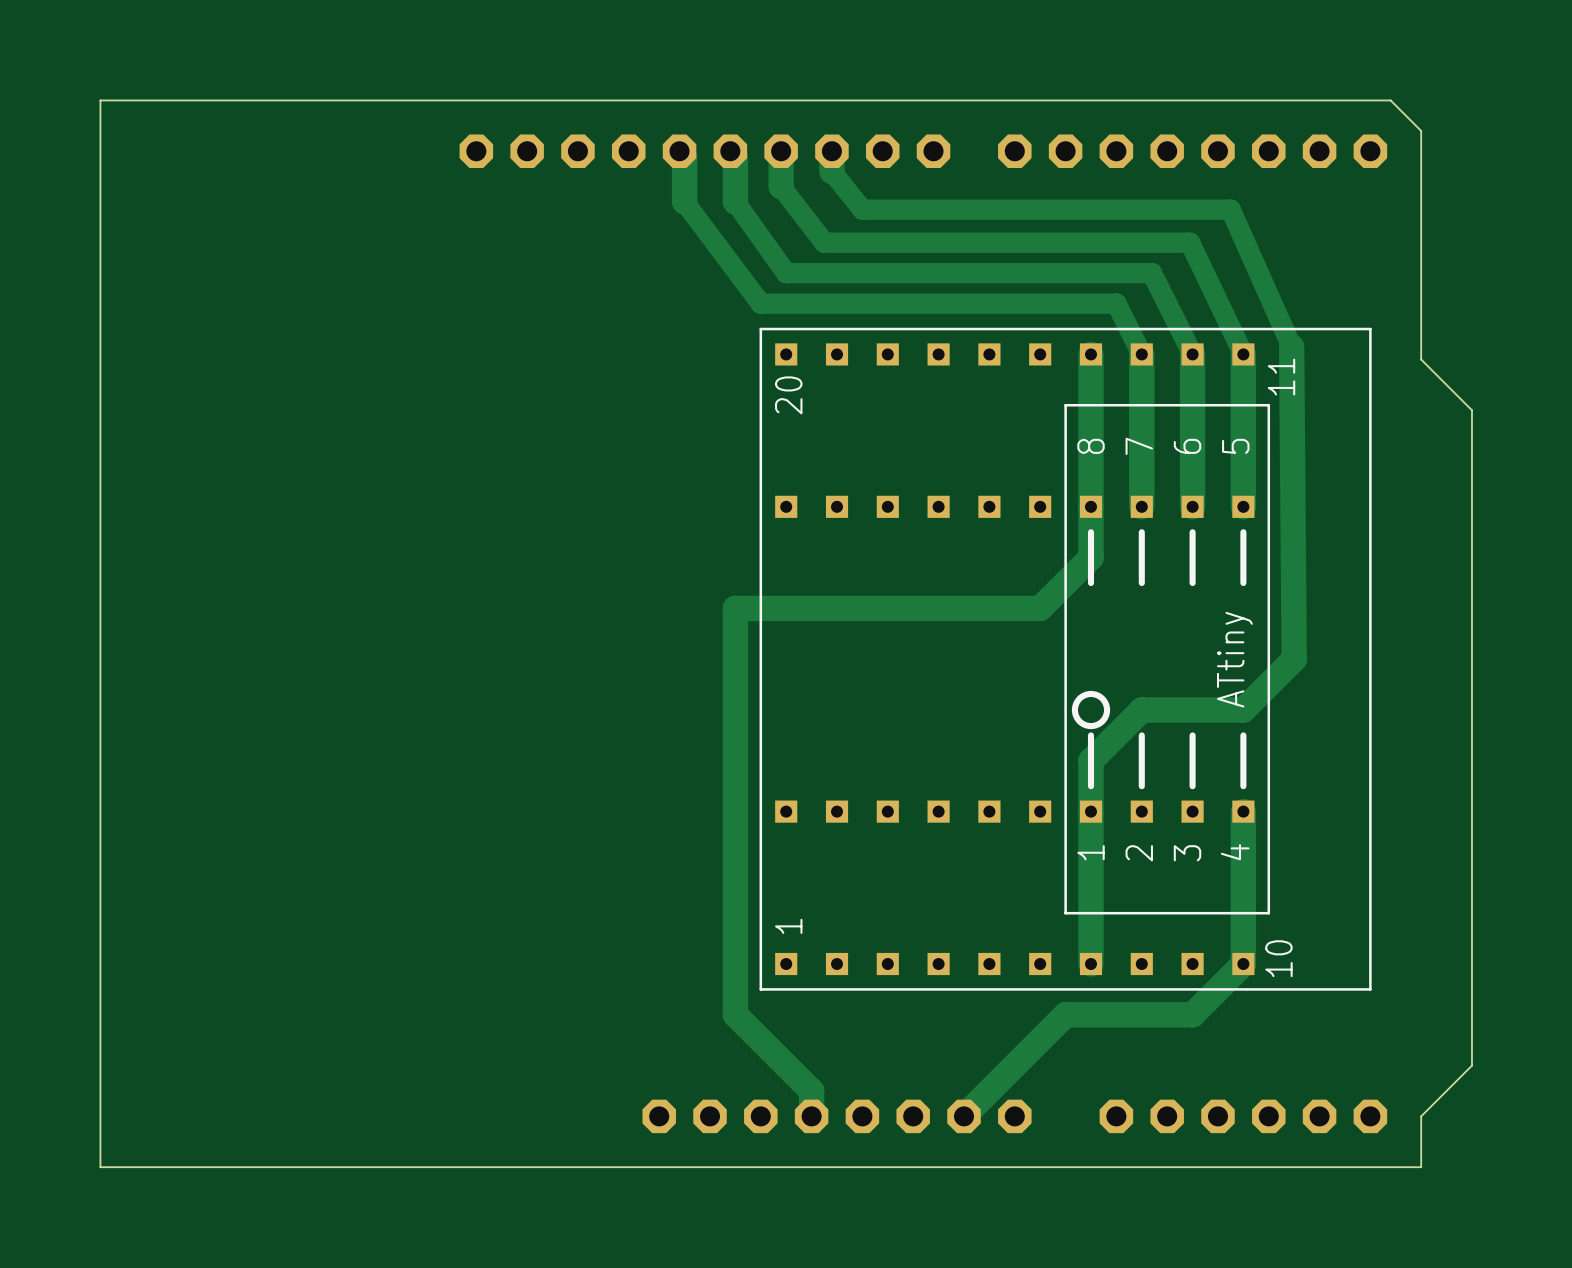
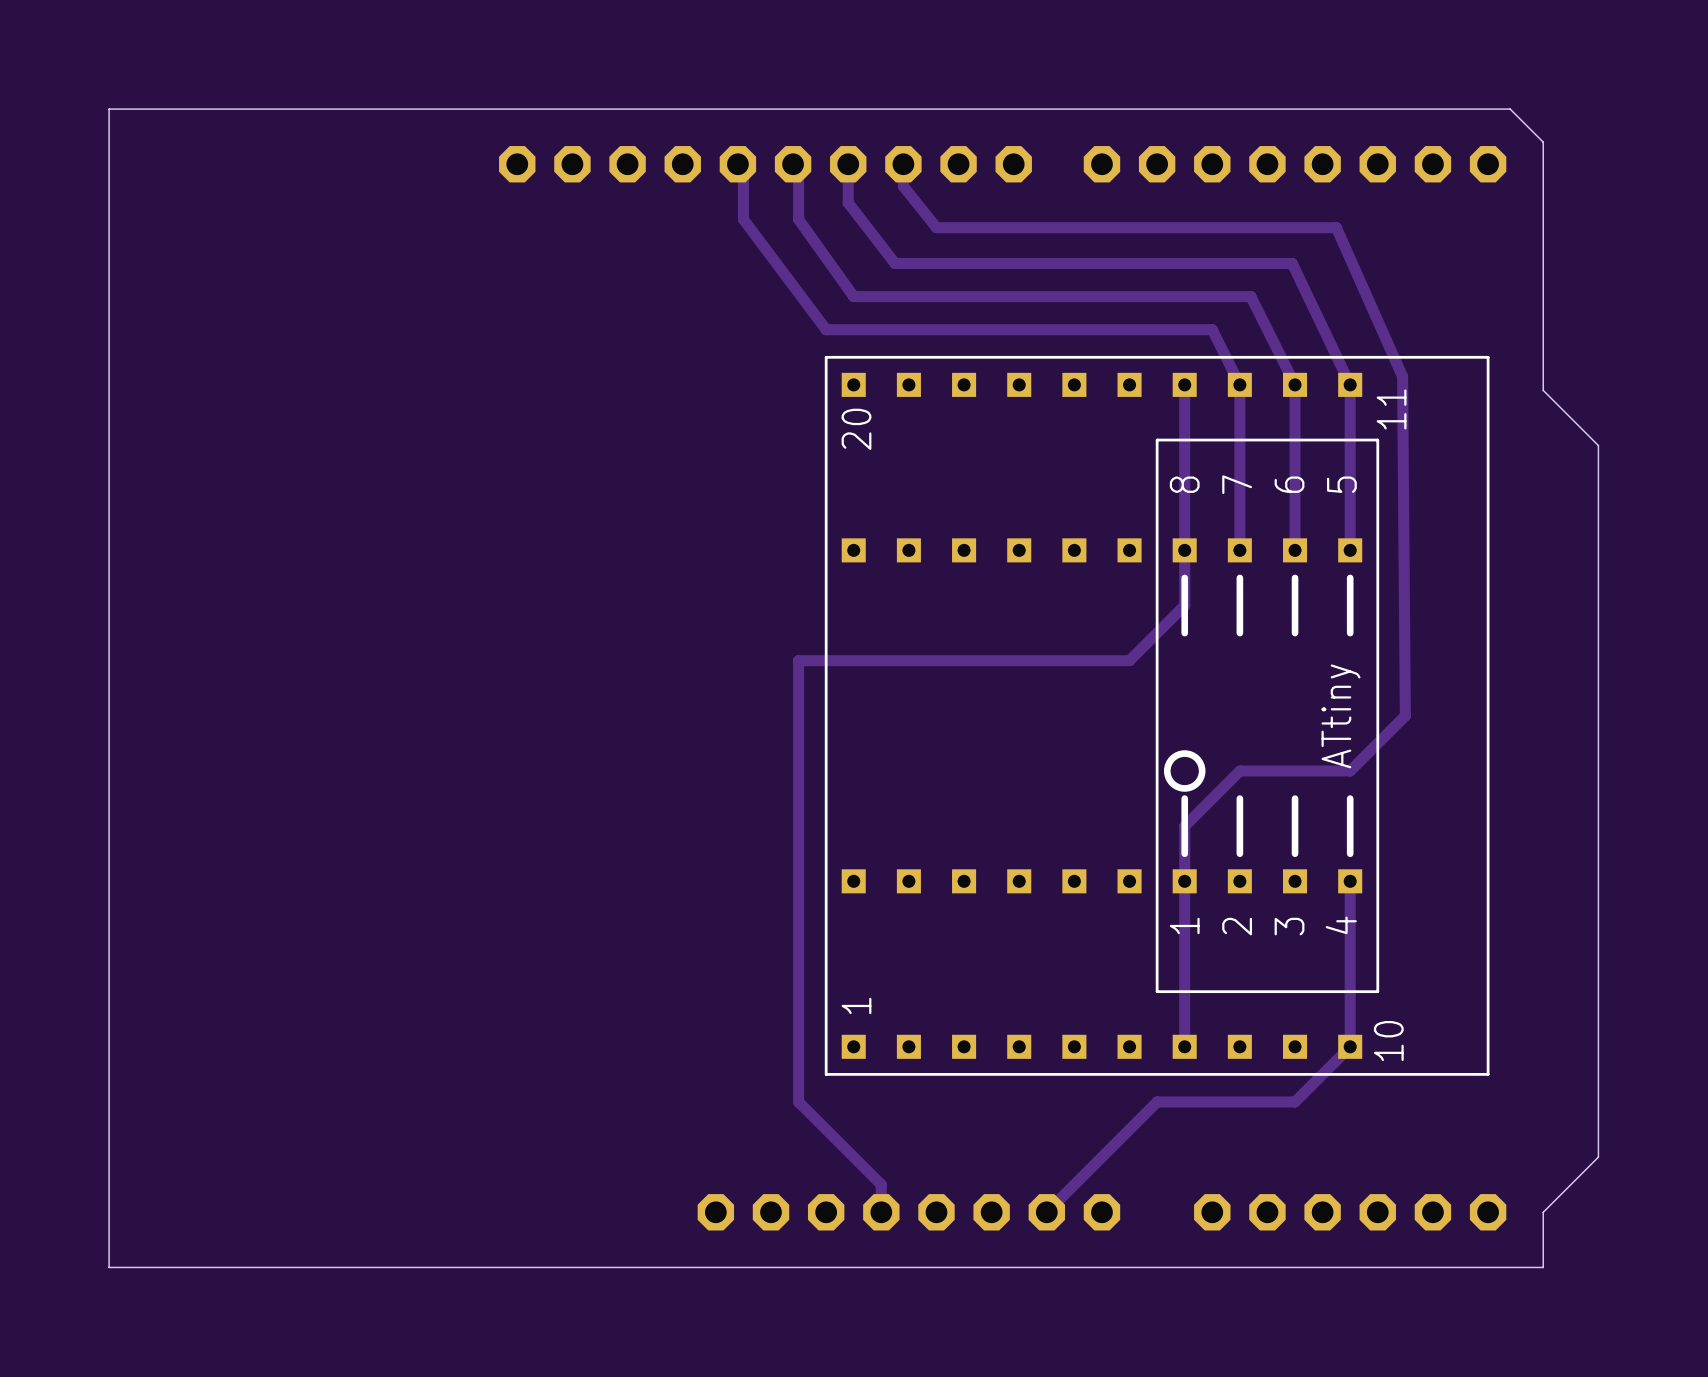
track width: thick (781, 151) (781, 186) (824, 242) (1190, 242) (1243, 354) (1243, 506) -> thin (848, 164) (848, 202) (895, 263) (1292, 263) (1350, 384) (1350, 550)
track width: thick (831, 151) (831, 171) (862, 209) (1230, 209) (1291, 346) (1294, 659) (1243, 710) (1141, 710) (1091, 760) (1091, 964) -> thin (903, 164) (903, 186) (936, 227) (1336, 227) (1402, 376) (1405, 715) (1350, 771) (1239, 771) (1184, 826) (1184, 1046)
track width: thick (684, 156) (684, 202) (760, 303) (1116, 303) (1141, 354) (1141, 506) -> thin (743, 169) (743, 219) (826, 329) (1212, 329) (1239, 384) (1239, 550)
track width: thick (735, 156) (735, 202) (786, 273) (1151, 273) (1192, 354) (1192, 506) -> thin (798, 169) (798, 219) (853, 296) (1250, 296) (1295, 384) (1295, 550)
track width: thick (1091, 354) (1091, 557) (1040, 608) (735, 608) (735, 1014) (811, 1091) (811, 1116) -> thin (1184, 384) (1184, 605) (1129, 660) (798, 660) (798, 1101) (881, 1184) (881, 1212)
track width: thick (1243, 811) (1243, 964) (1192, 1014) (1065, 1014) (964, 1116) -> thin (1350, 881) (1350, 1046) (1295, 1101) (1157, 1101) (1046, 1212)

